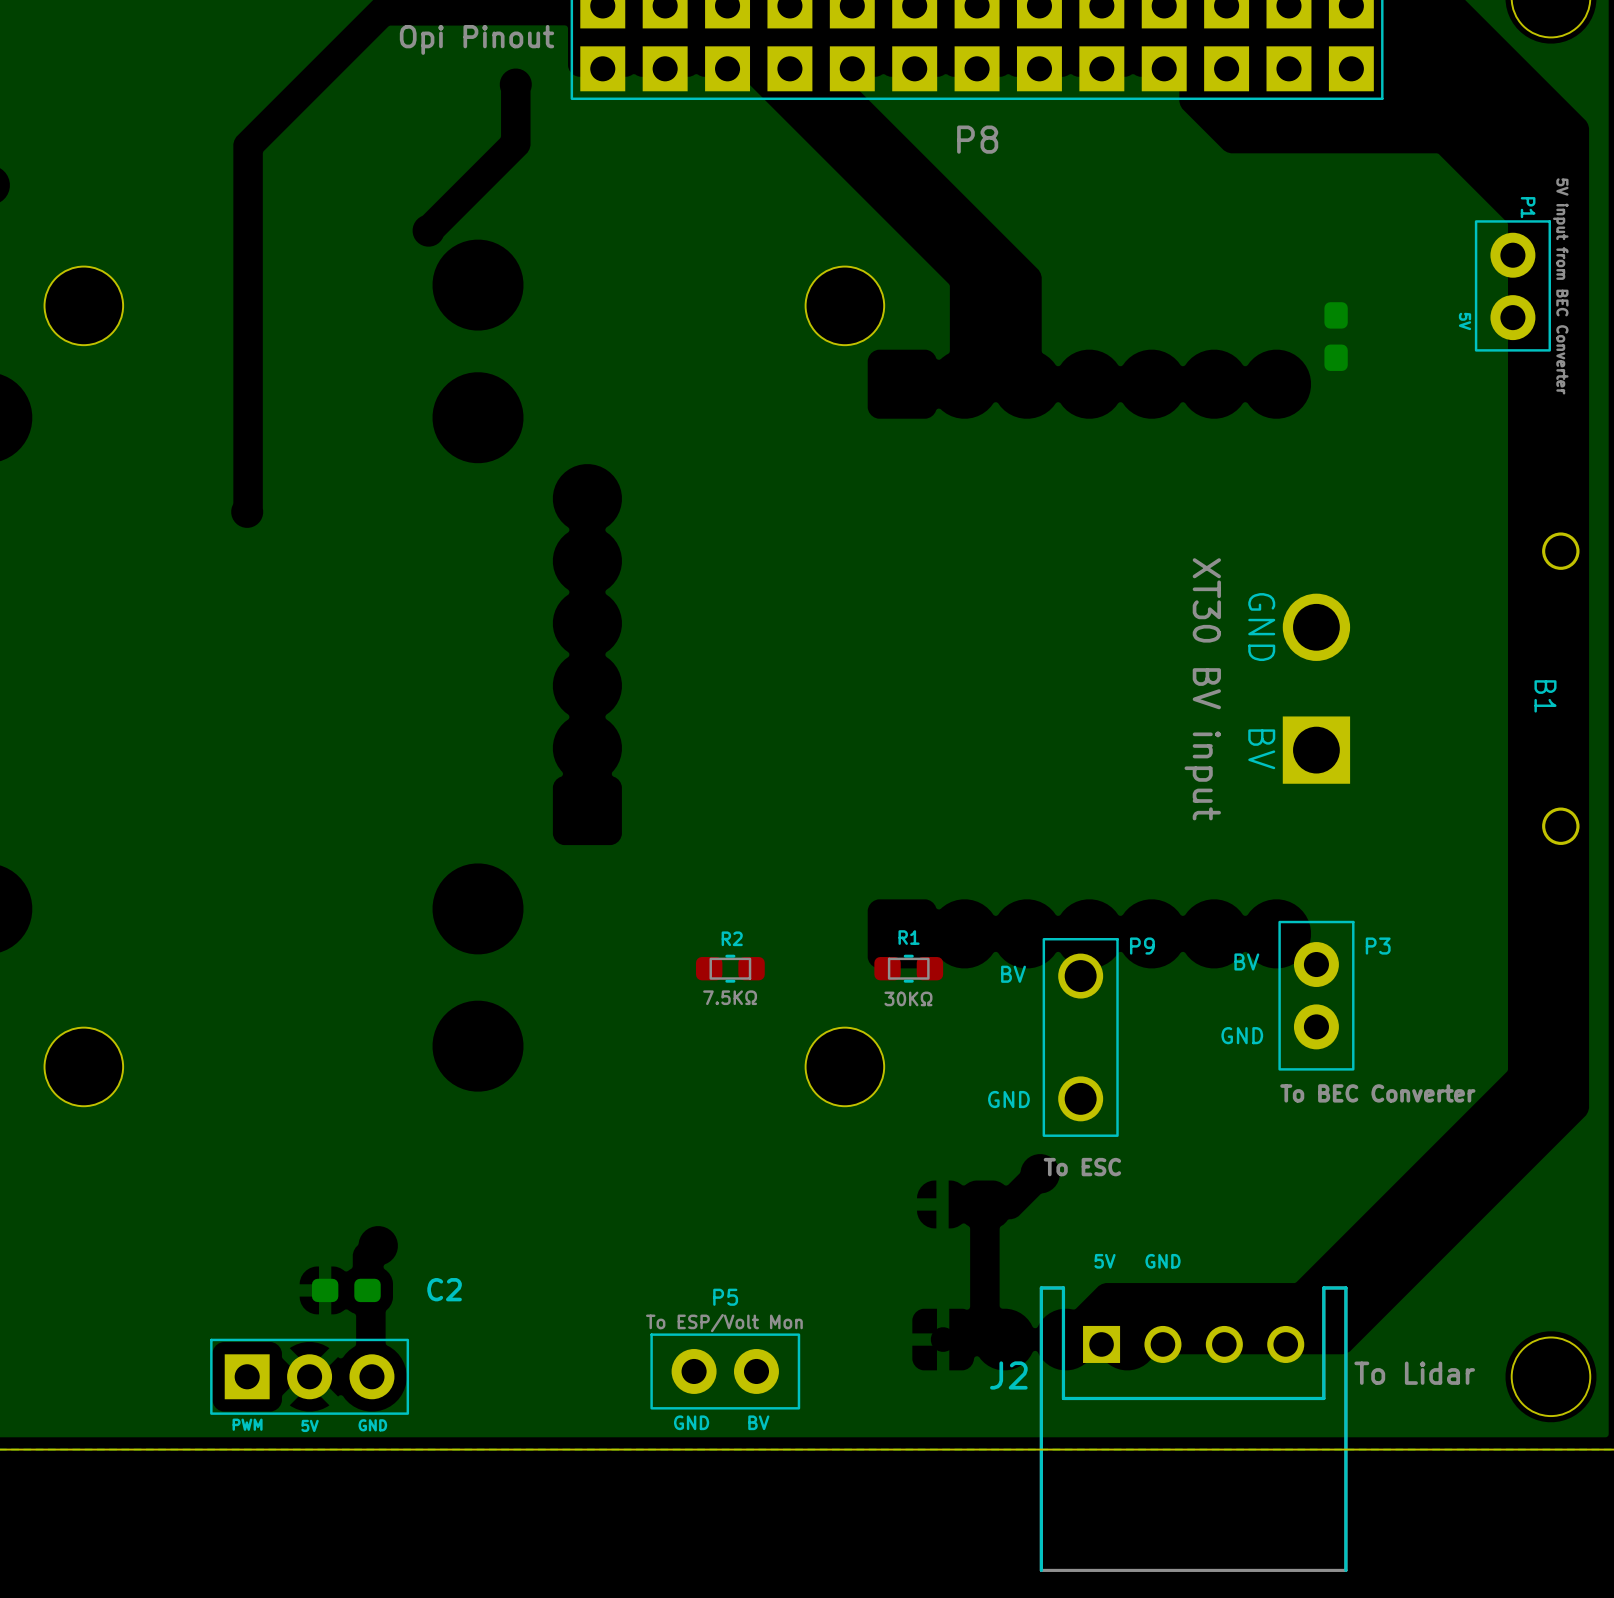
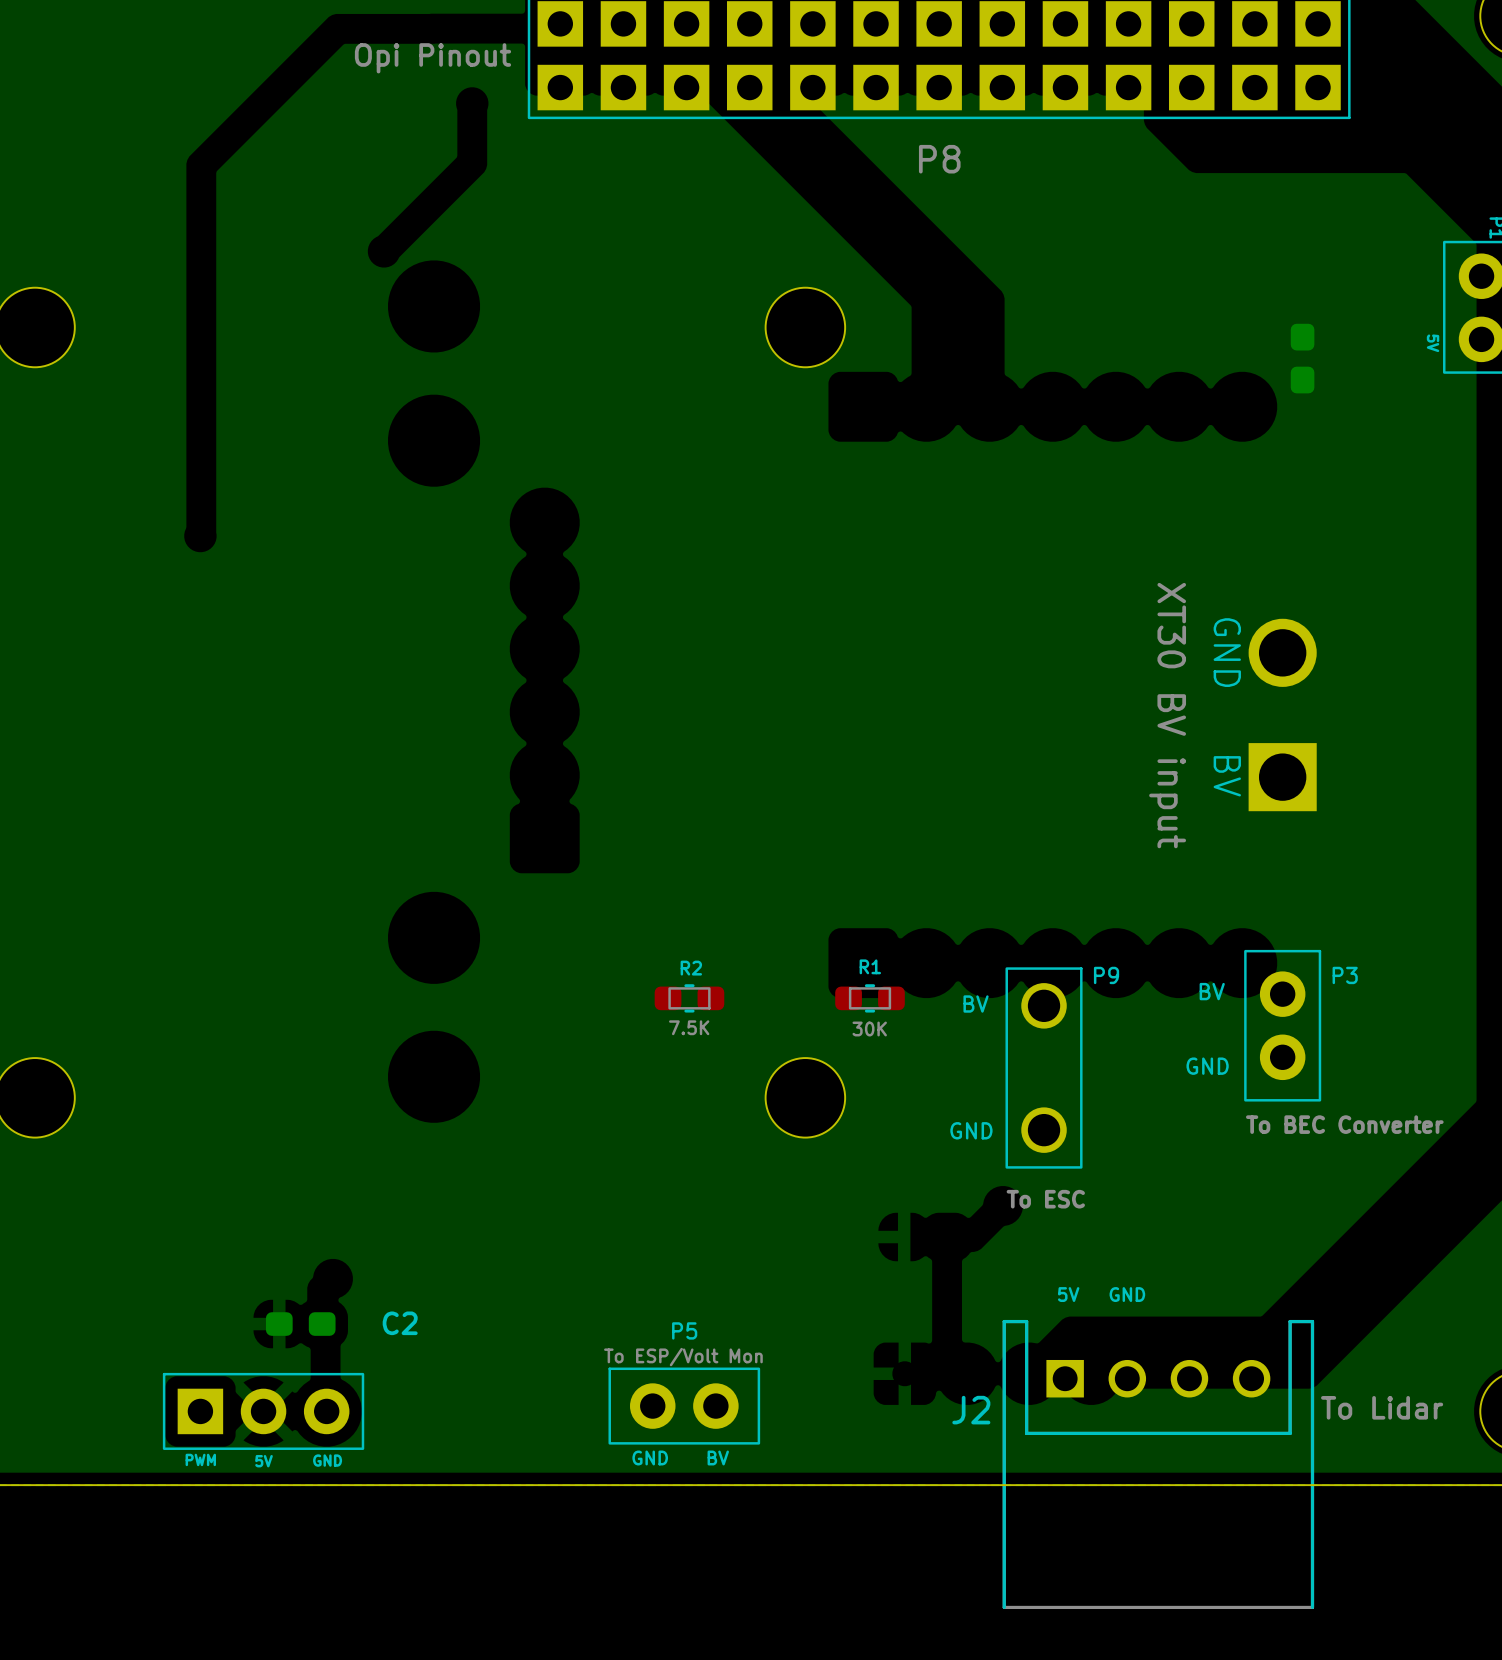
R2 value: 7.5KΩ (730, 997) -> 7.5K (689, 1027)
R1 value: 30KΩ (908, 998) -> 30K (869, 1028)

